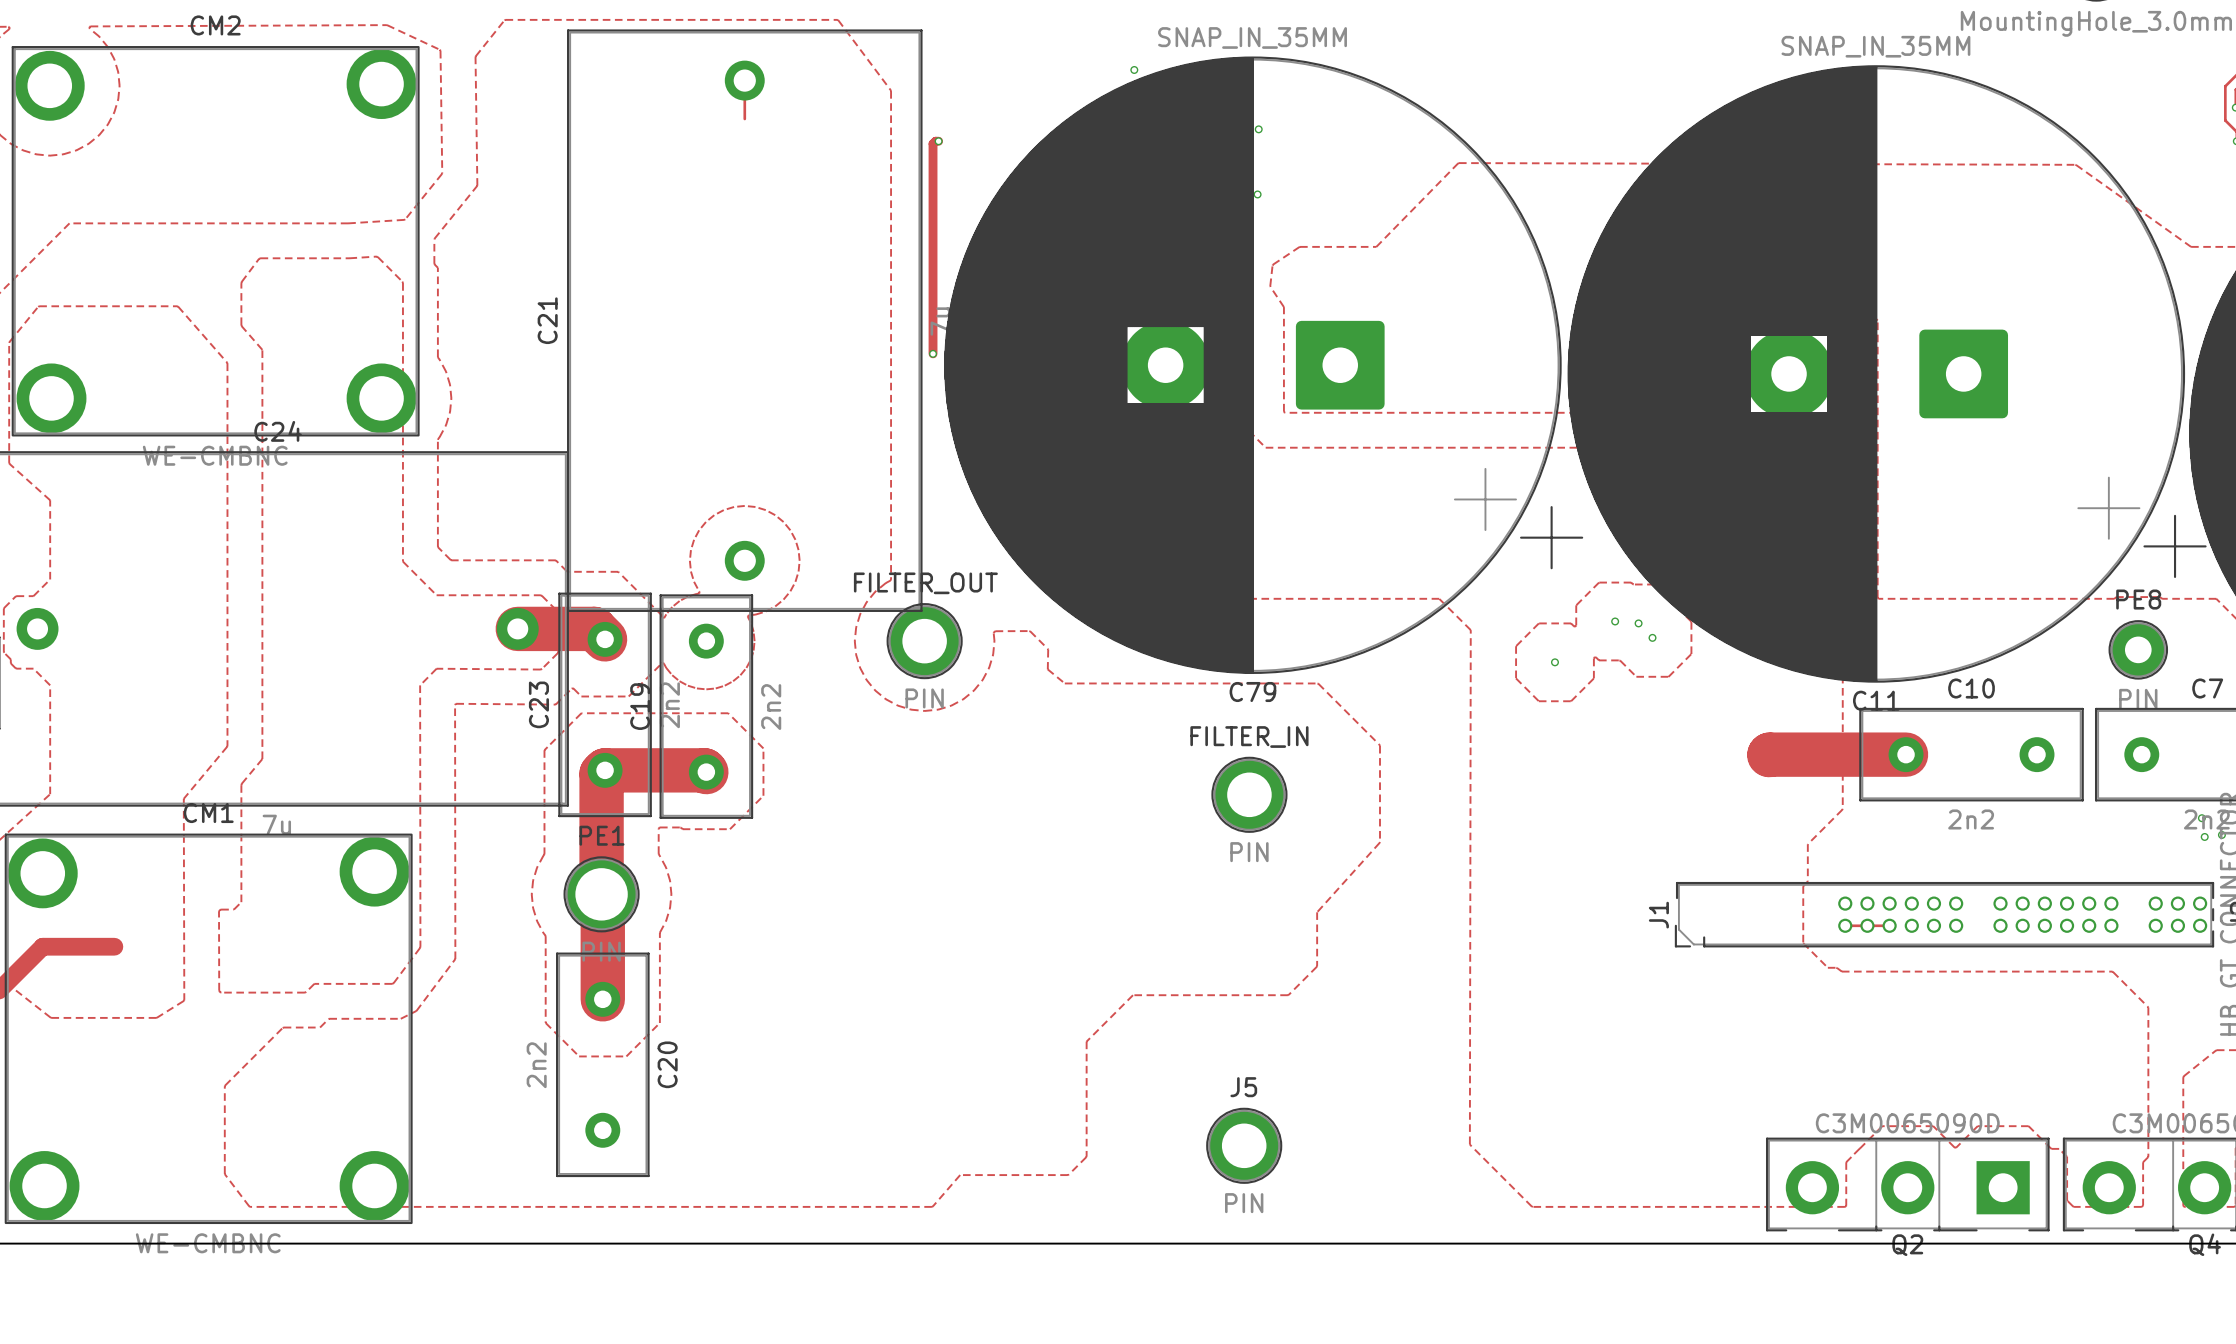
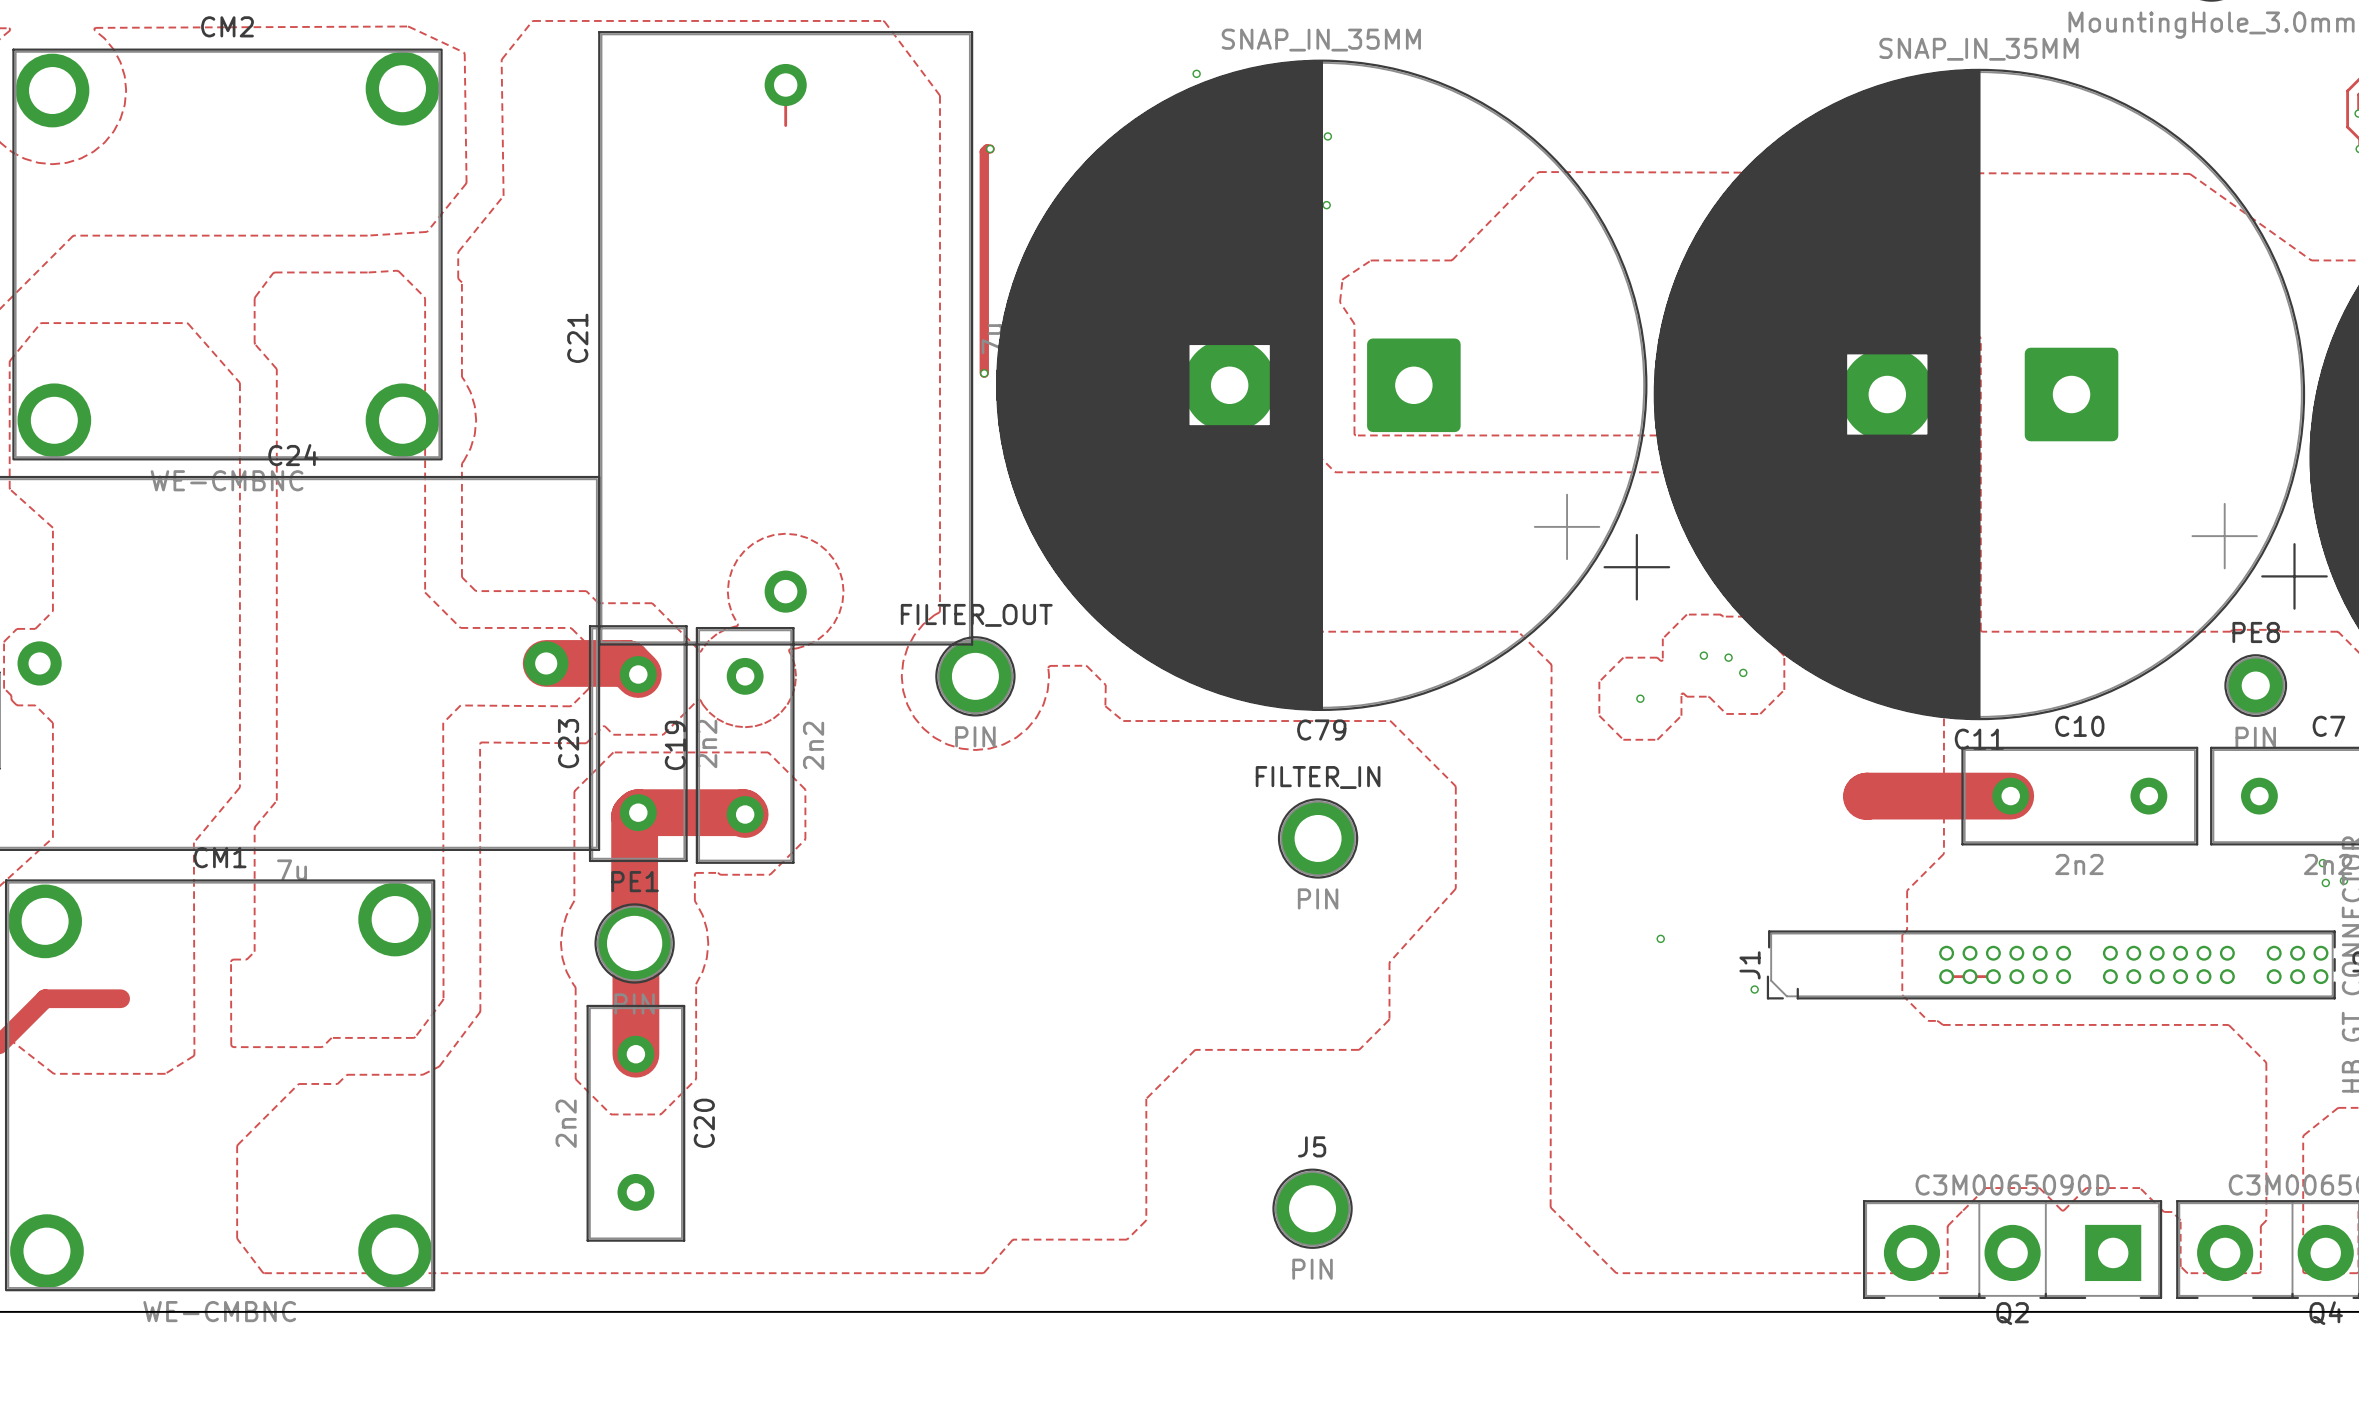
via: none -> (1660, 938)
via: none -> (1754, 989)

